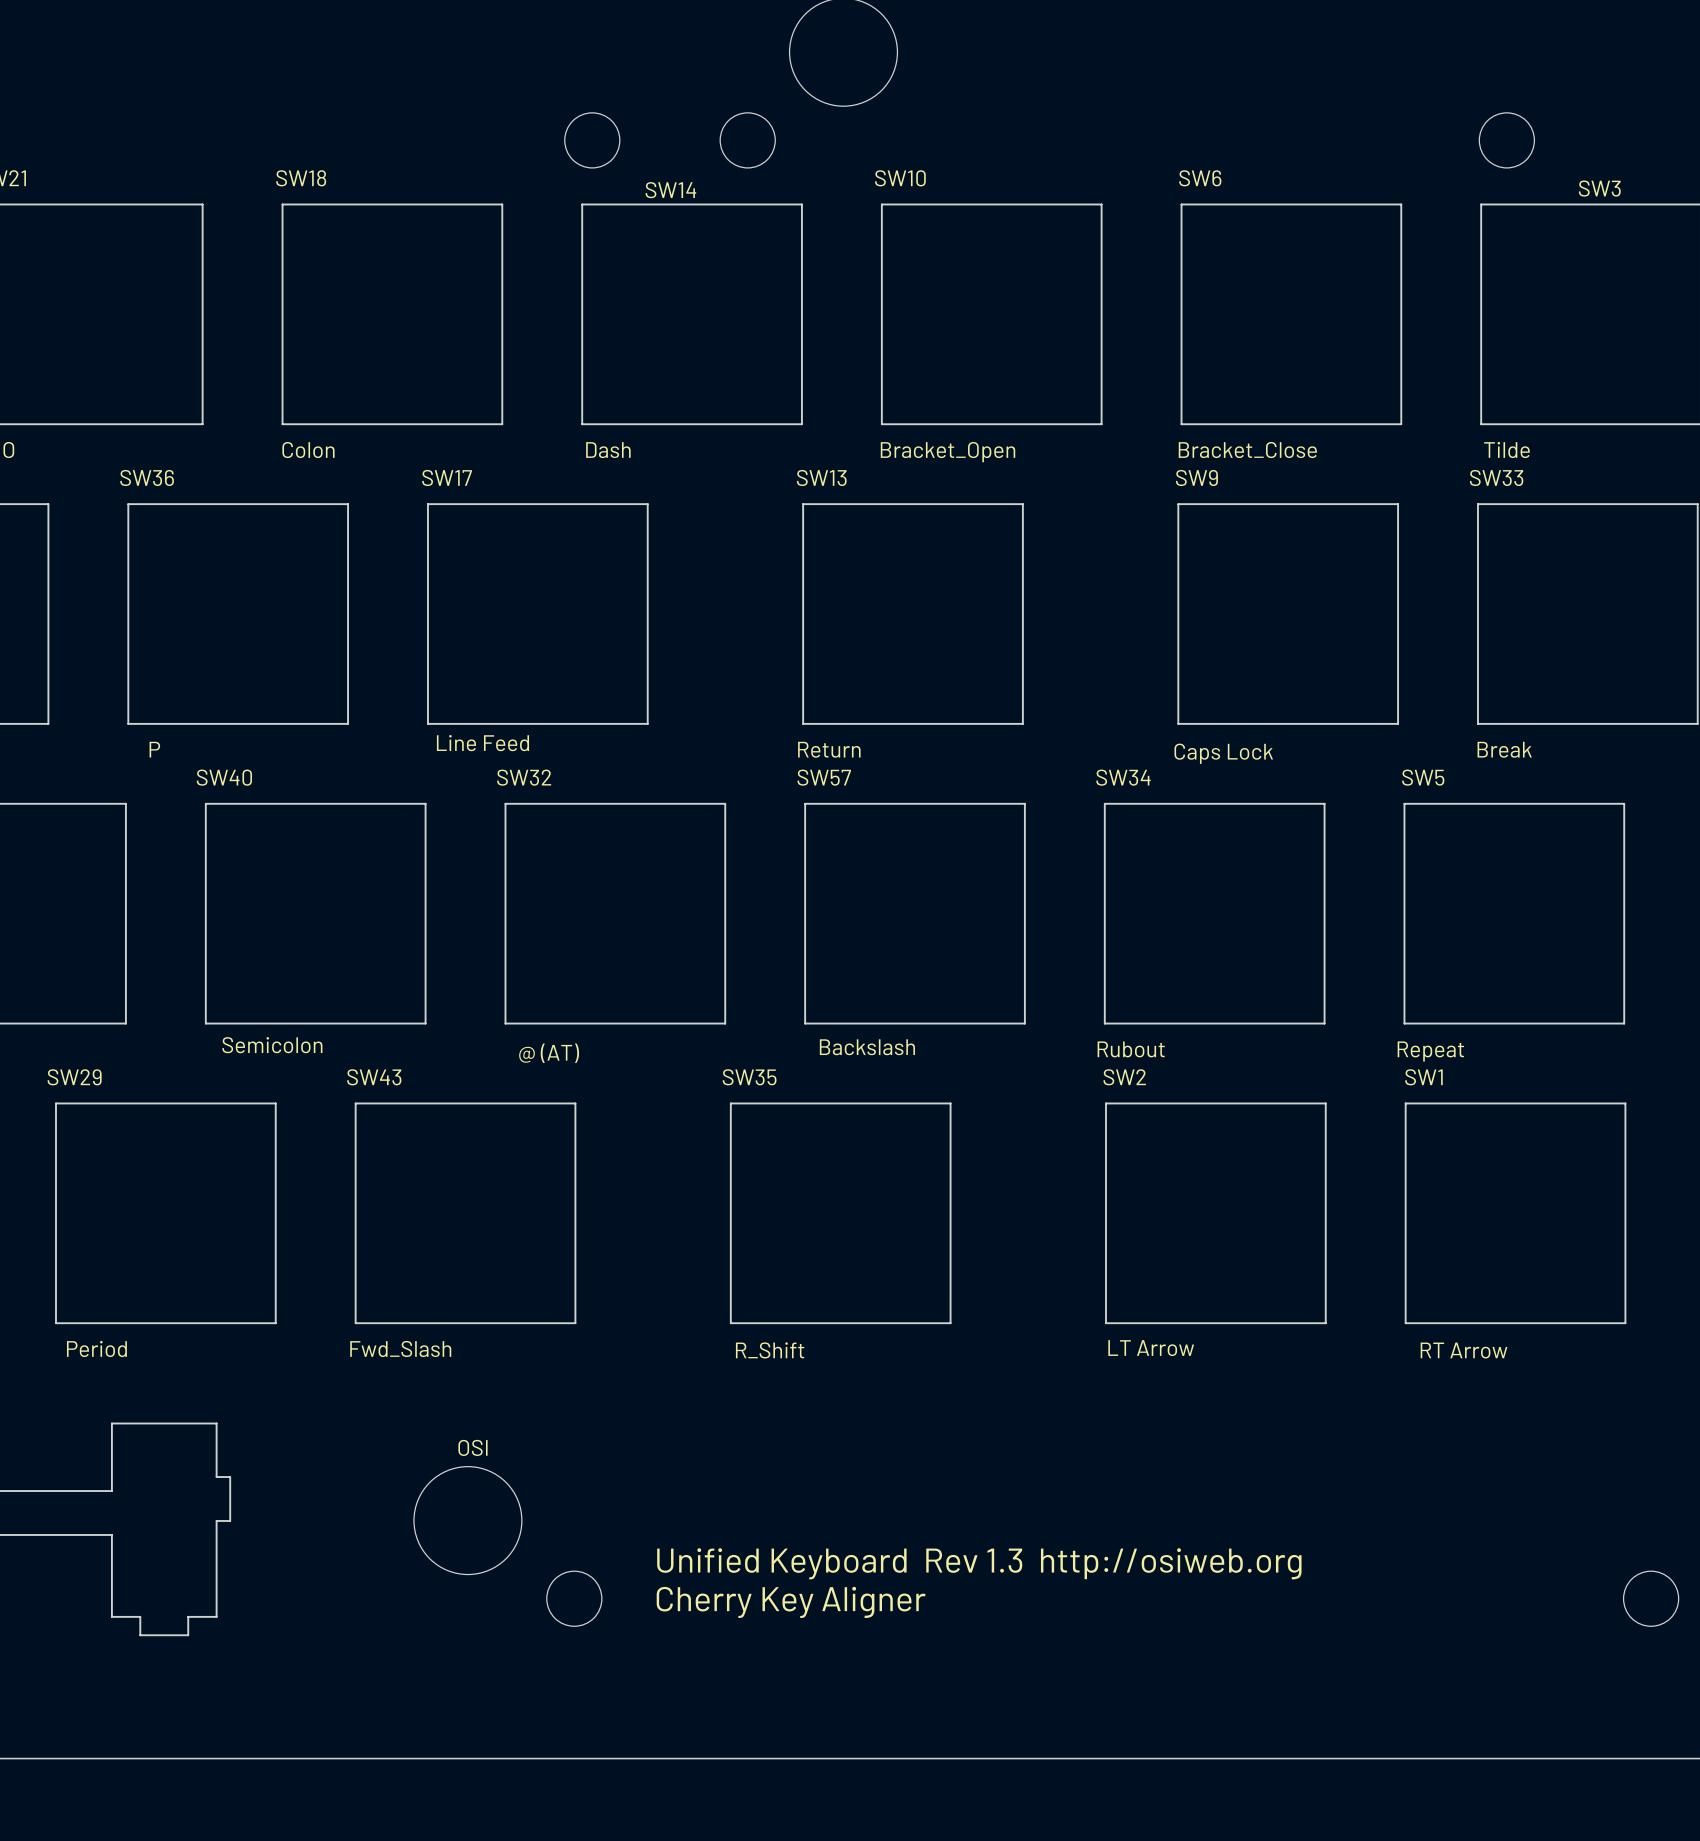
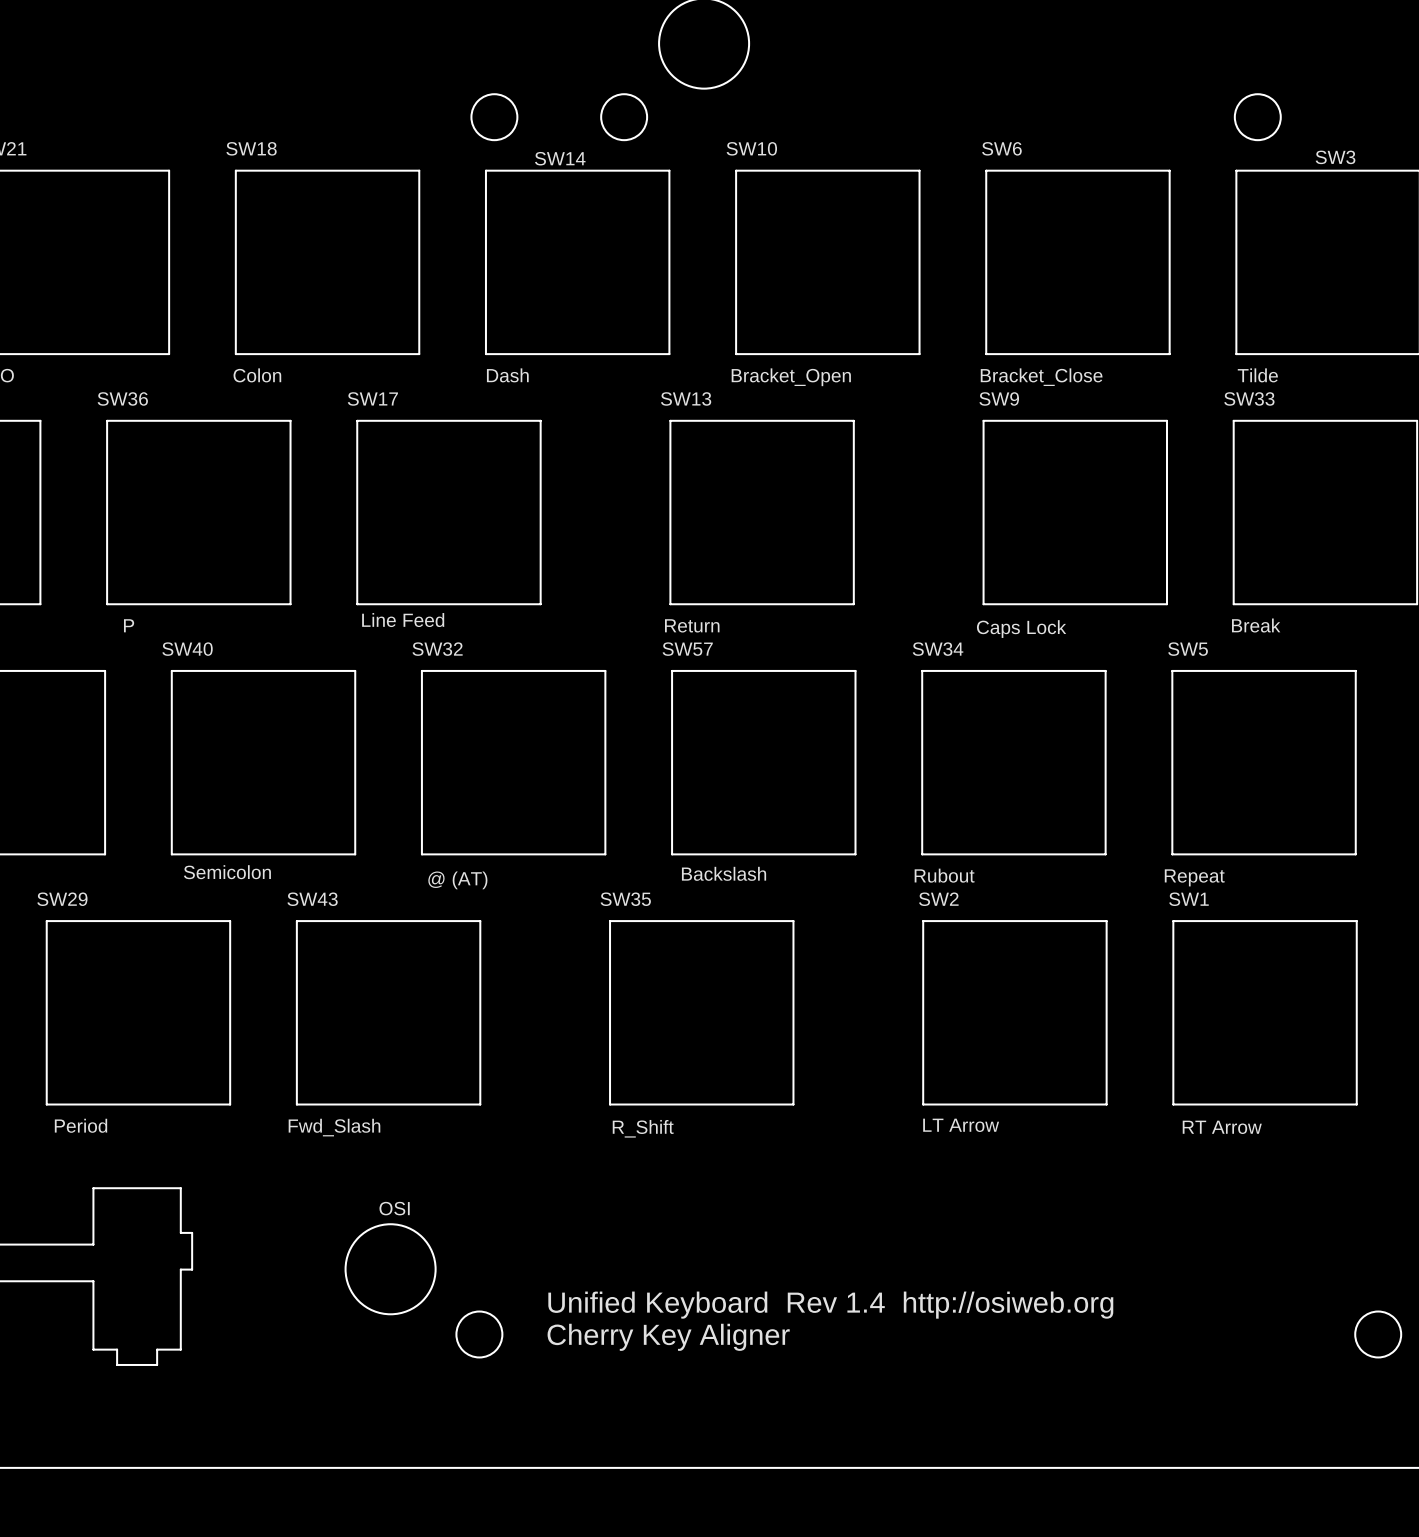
text: Unified Keyboard Rev 1.3 http://osiweb.org (979, 1563) -> Unified Keyboard Rev 1.4 http://osiweb.org (830, 1305)

